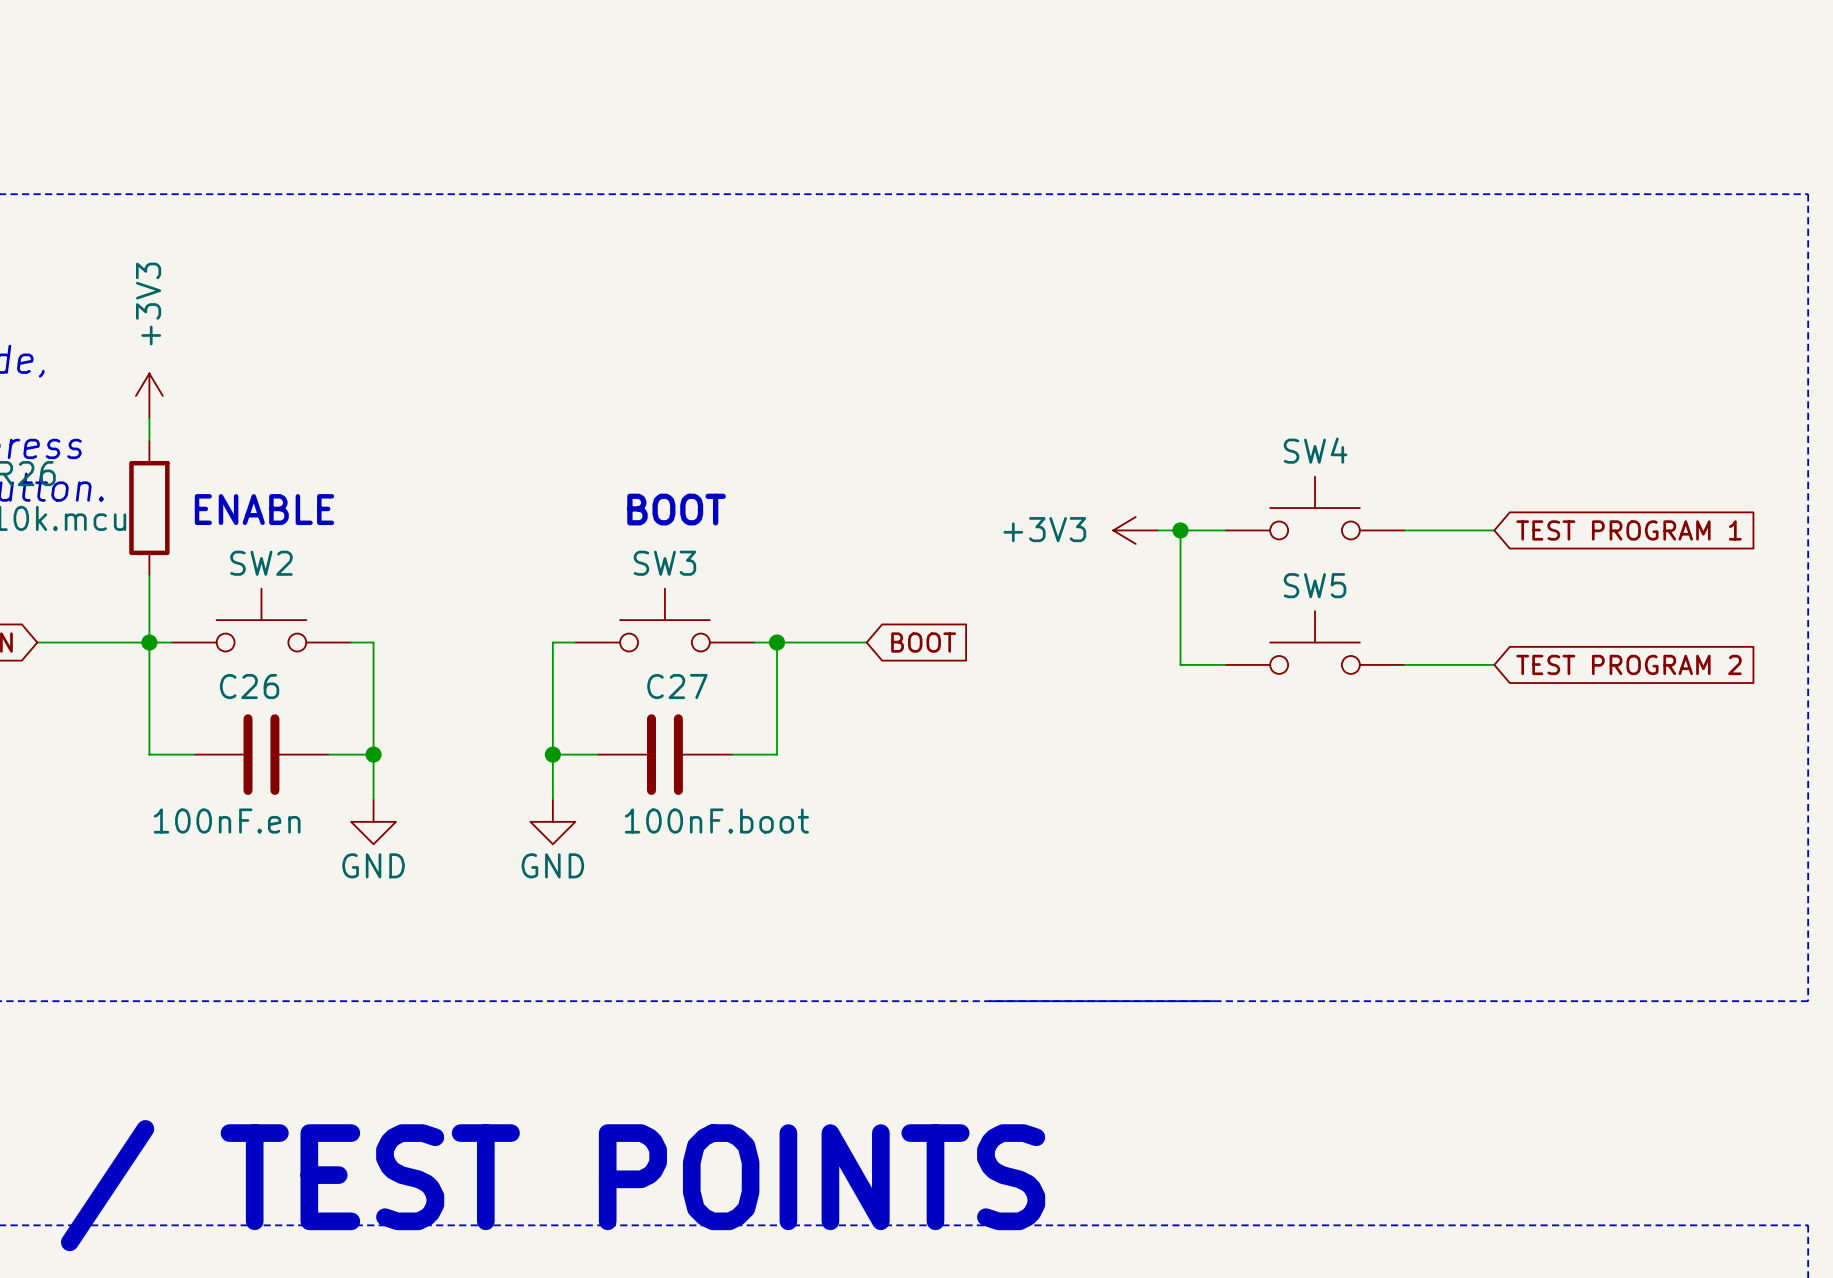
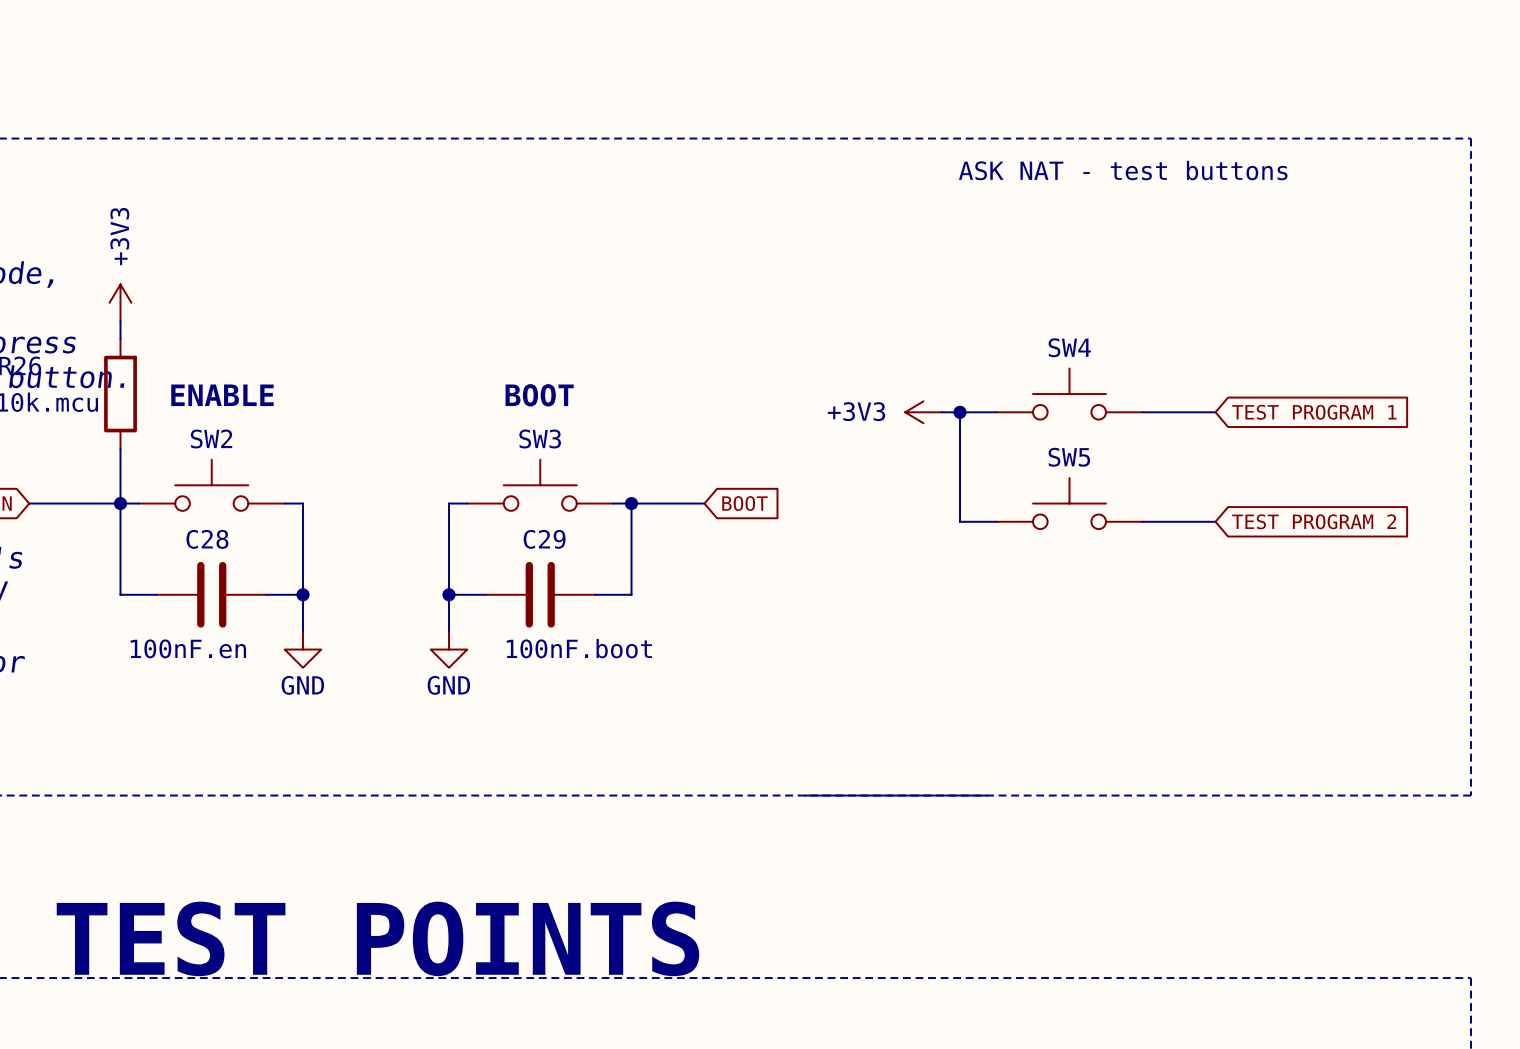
text: none -> ASK NAT - test buttons (1123, 170)
C26 name: C26 (249, 686) -> C28 (207, 539)
C27 name: C27 (677, 686) -> C29 (544, 539)

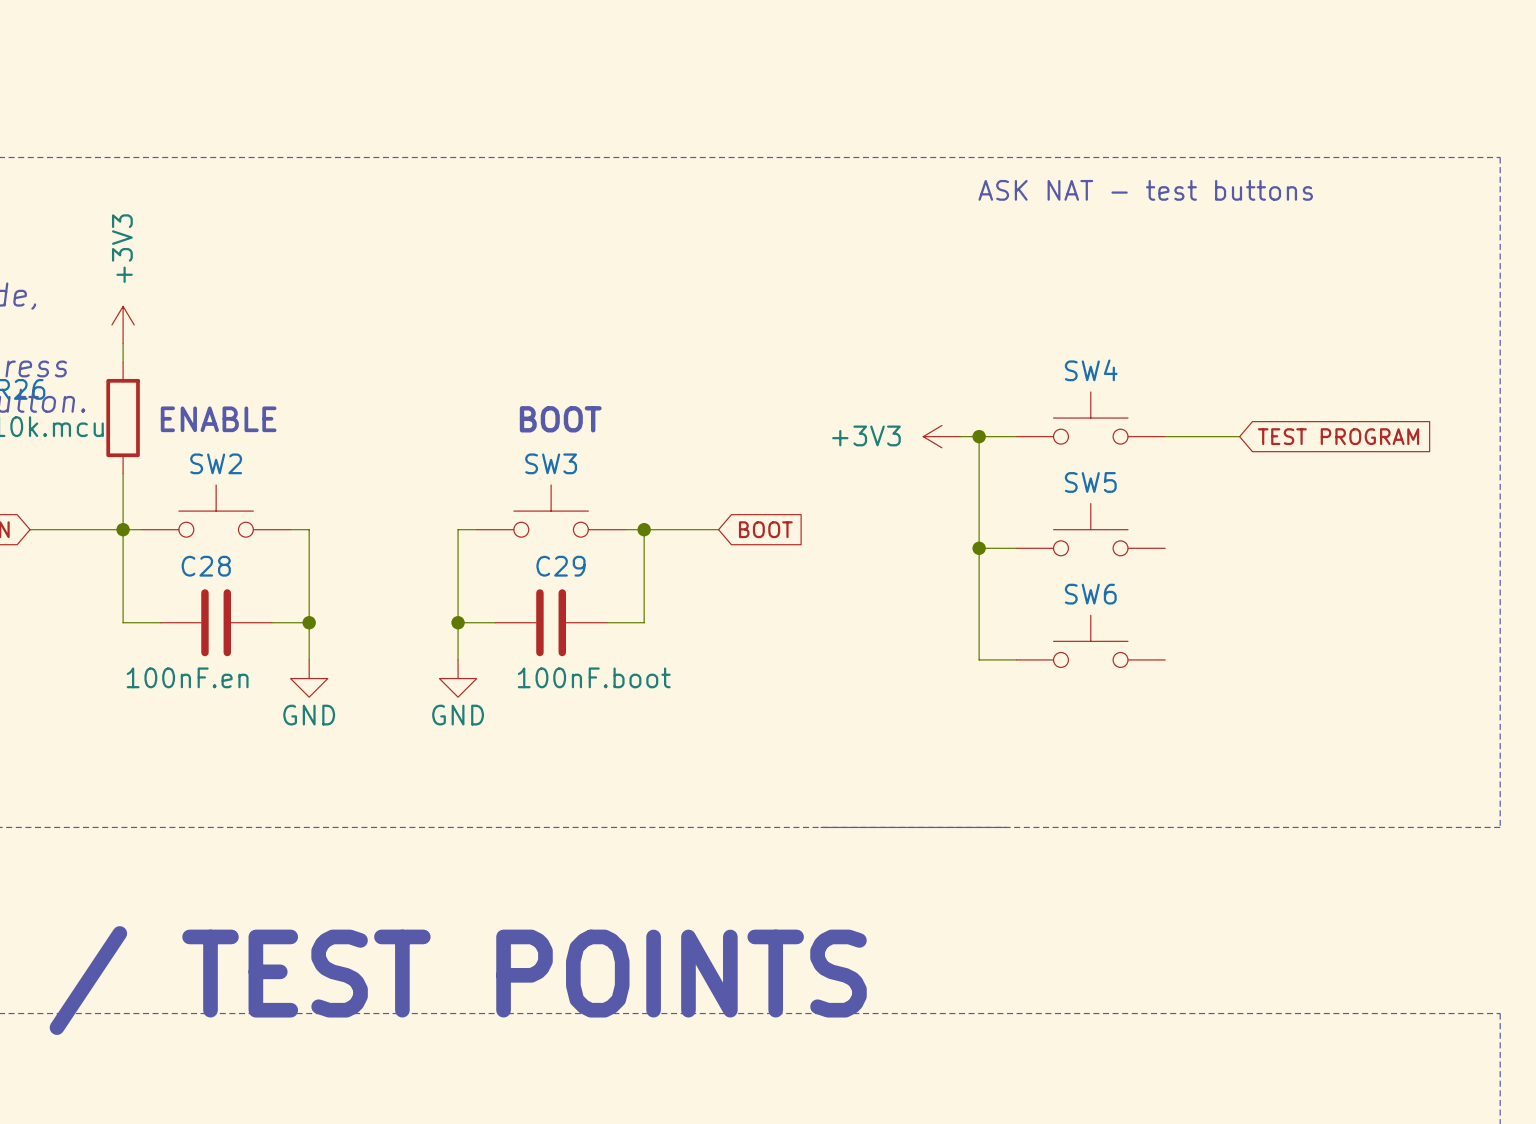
global label: TEST PROGRAM 1 (1314, 412) -> TEST PROGRAM (1338, 436)
wire: none -> (979, 548) (979, 659) (1016, 659)
junction: none -> (979, 548)
wire: (1142, 521) (1215, 521) -> none
global label: TEST PROGRAM 2 (1314, 521) -> none
SW6: none -> (1090, 641)

